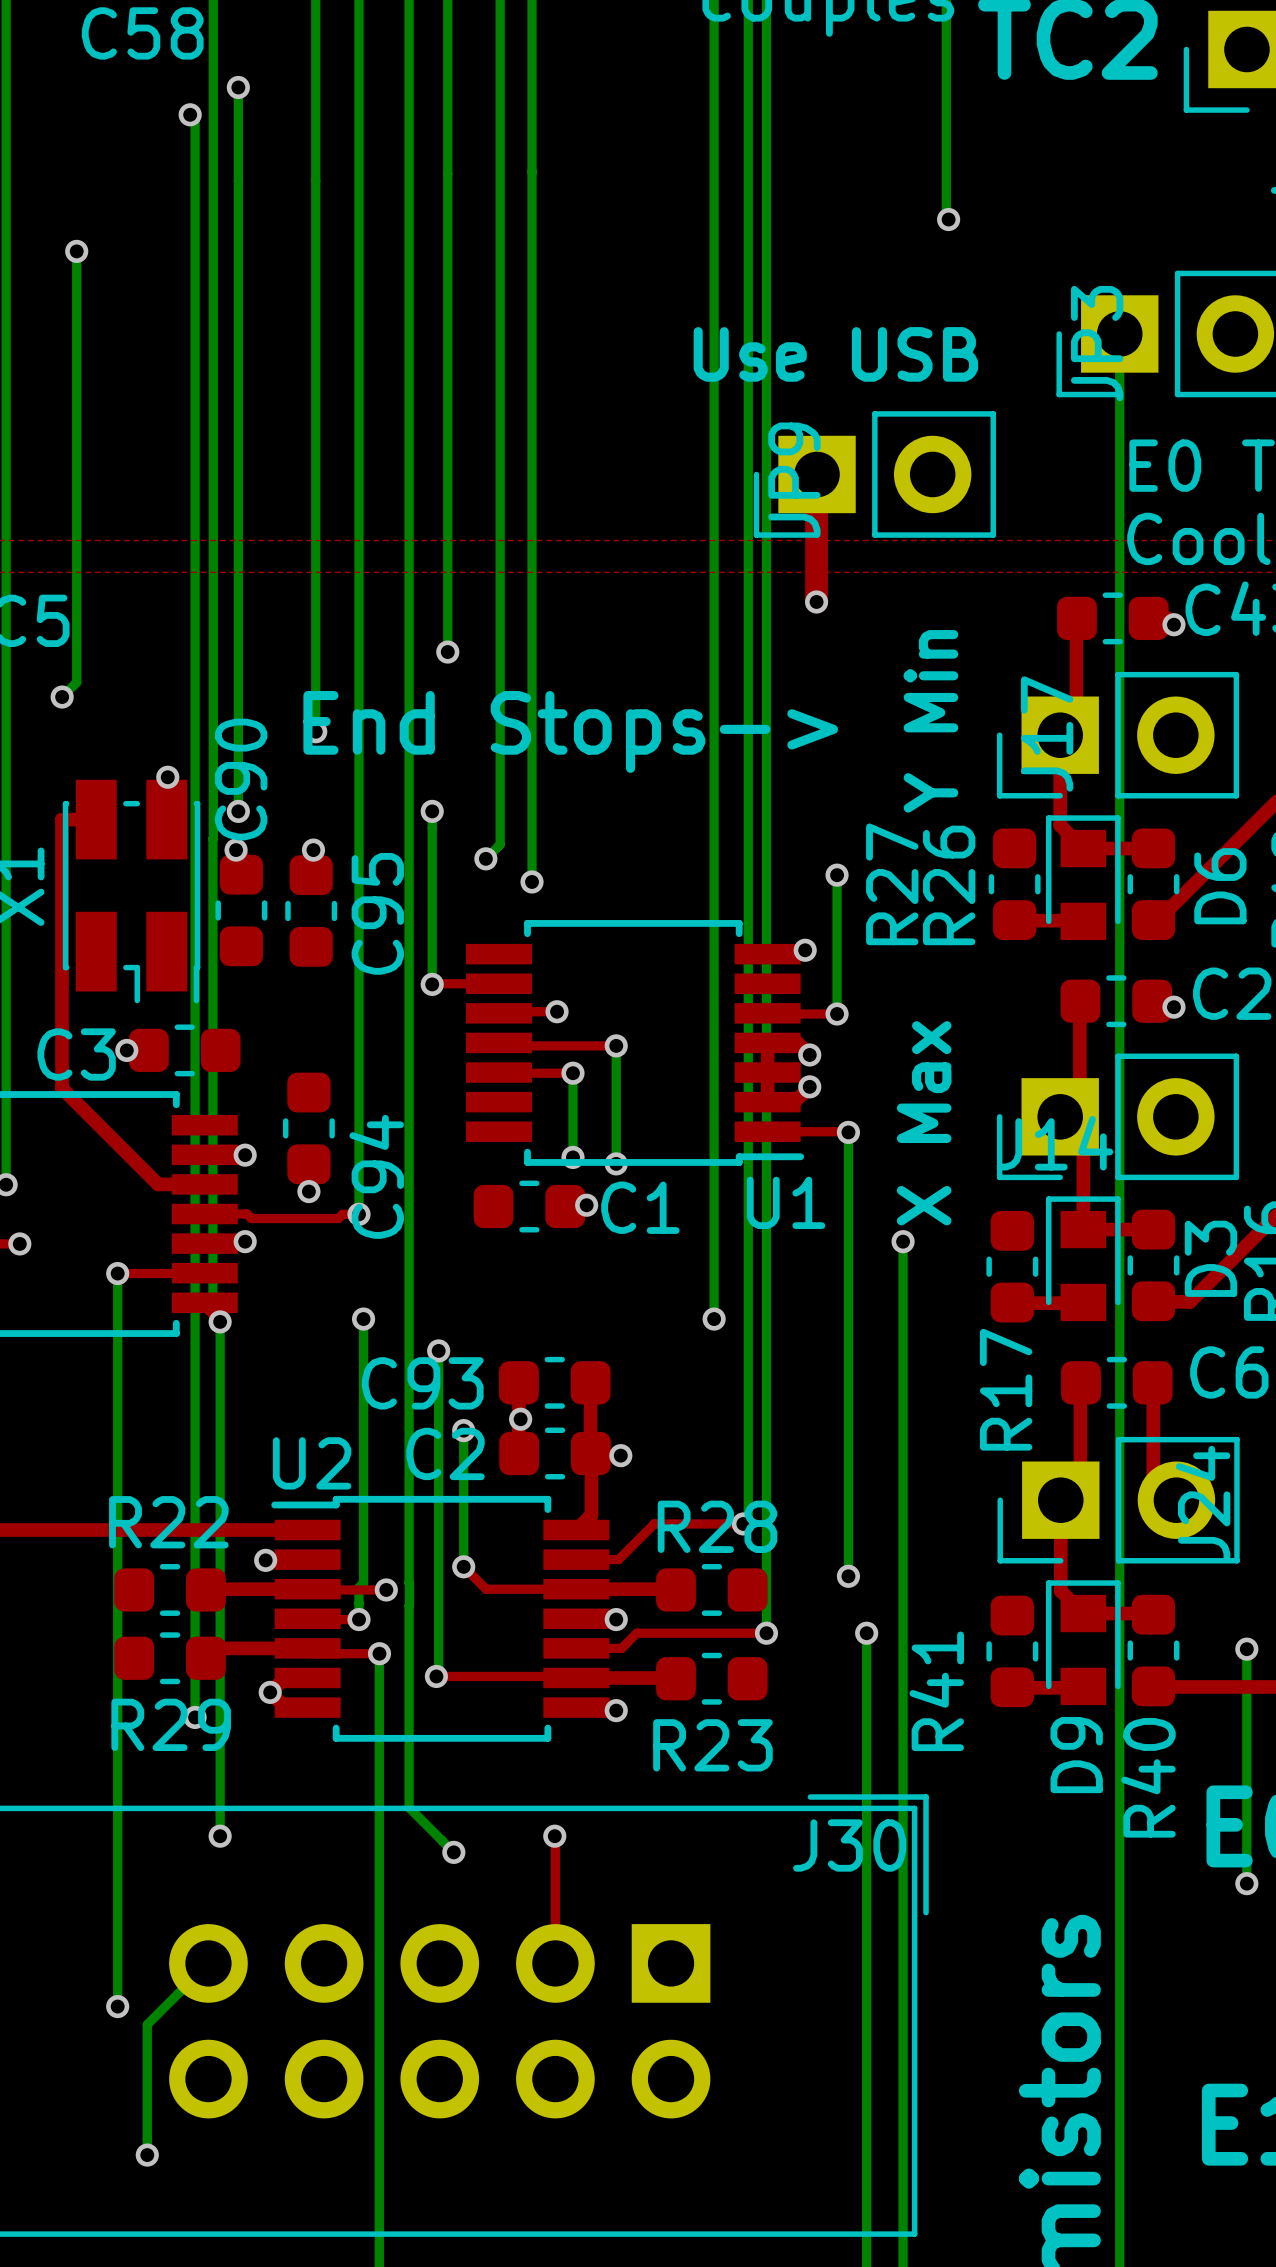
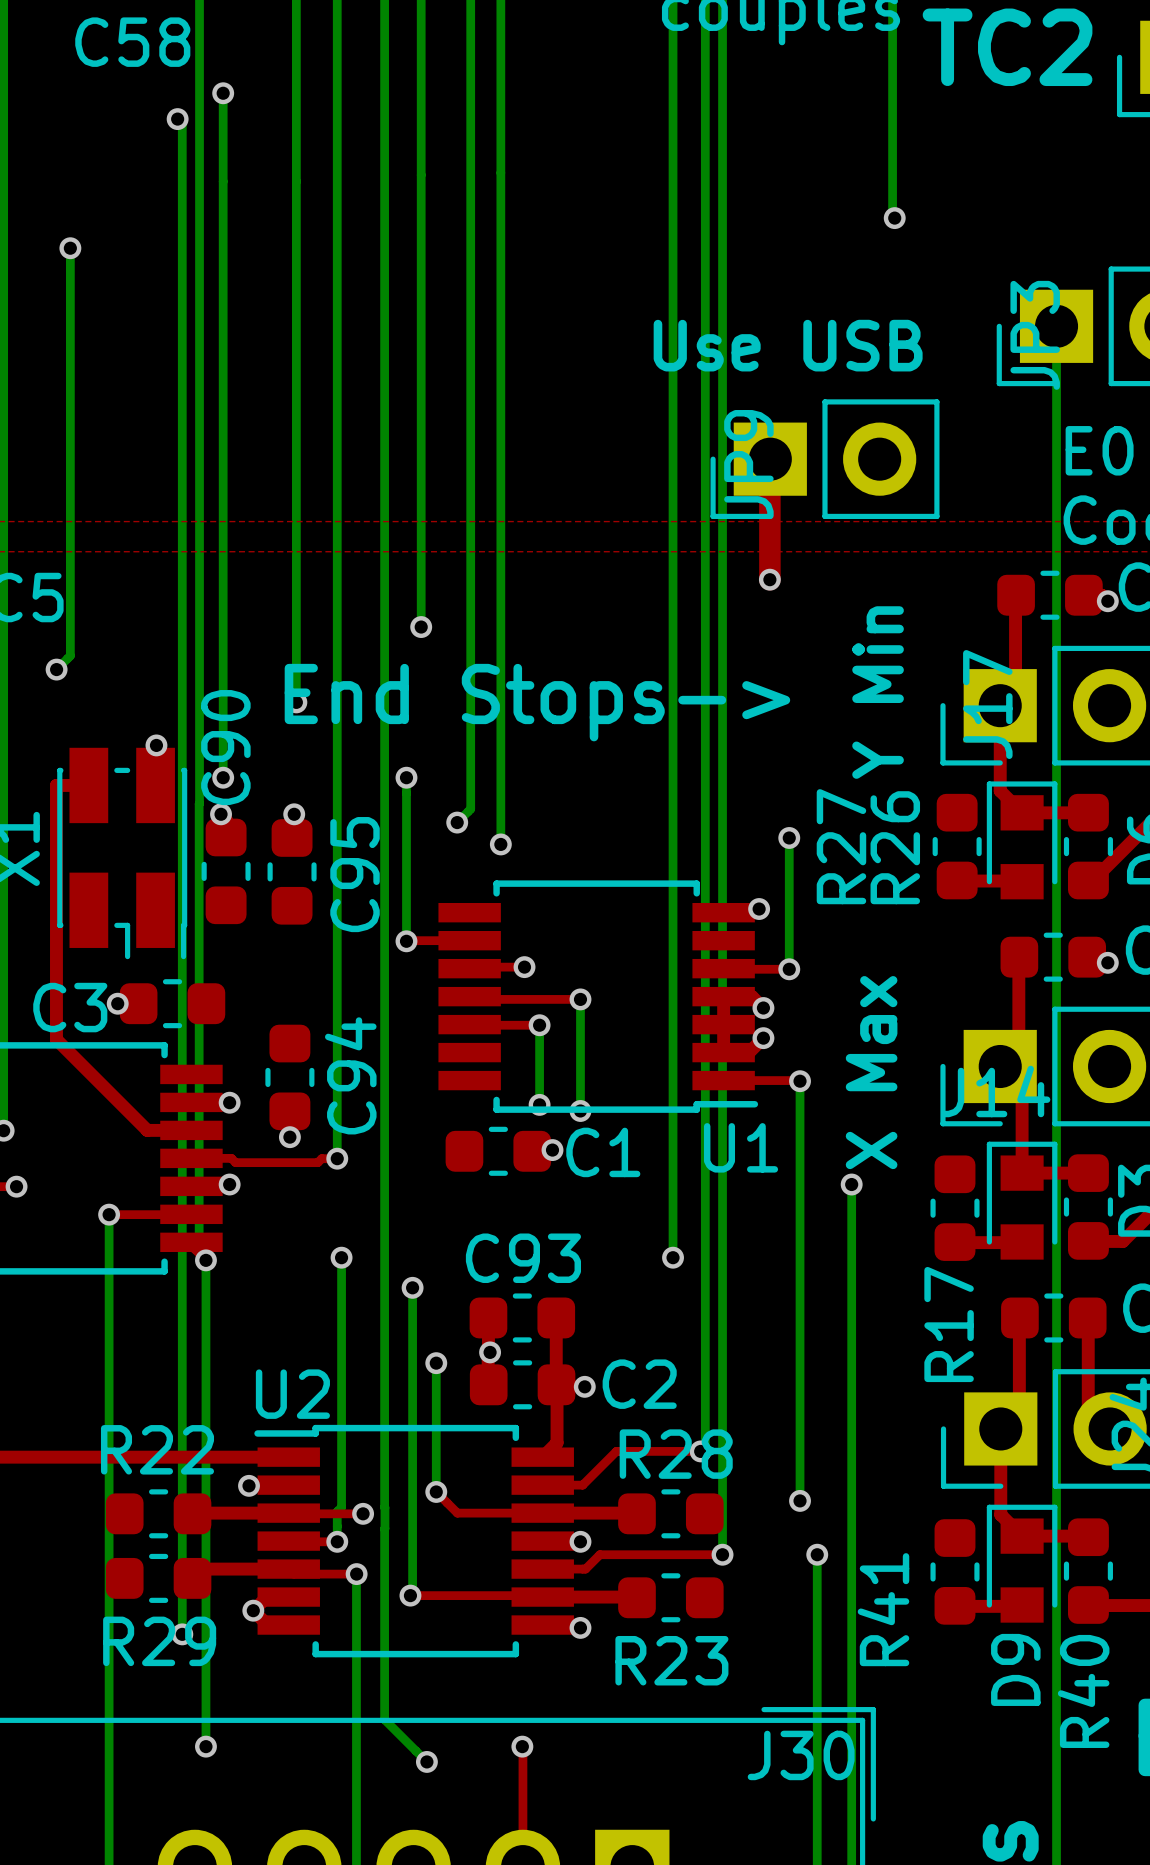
C94 name position: C94 (376, 1176) -> C94 (350, 1075)
C93 name position: C93 (422, 1383) -> C93 (523, 1258)
C2 name position: C2 (445, 1453) -> C2 (639, 1384)

